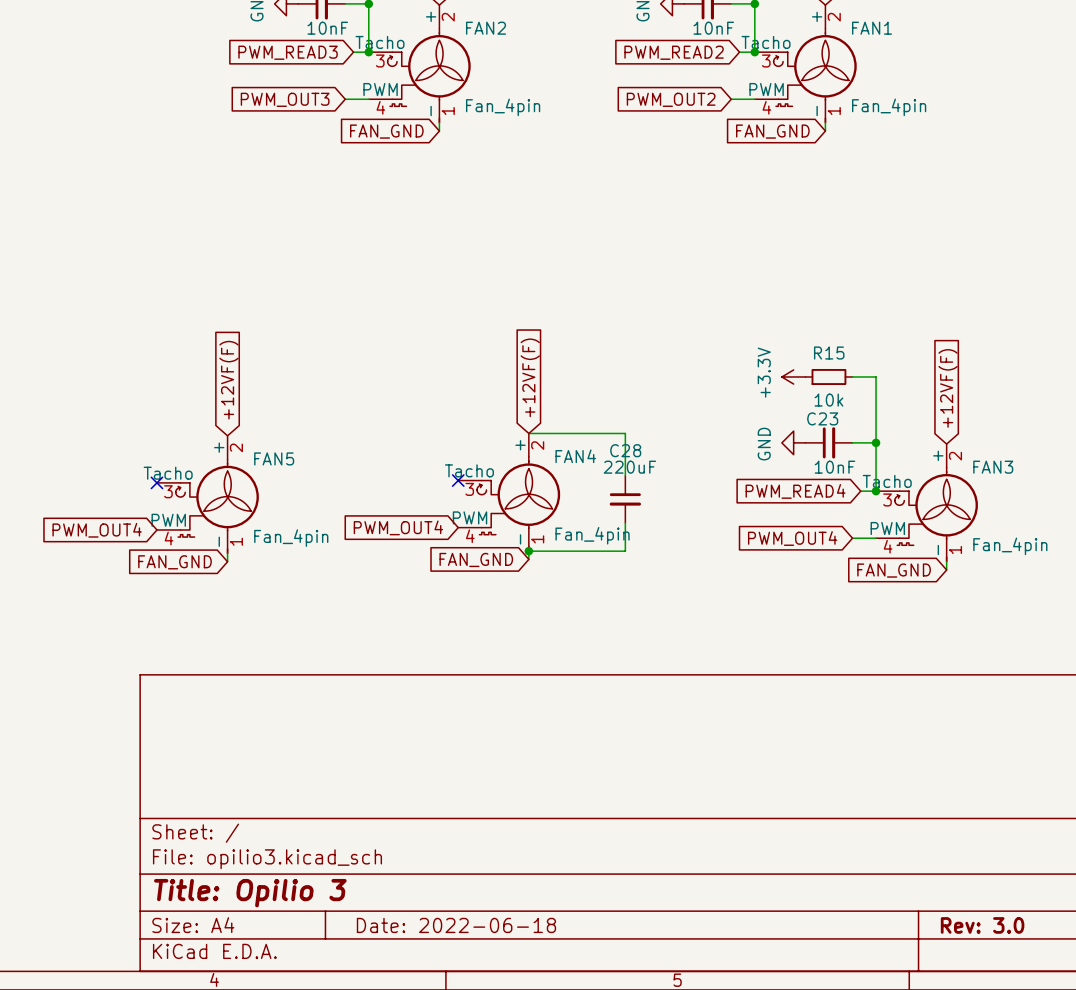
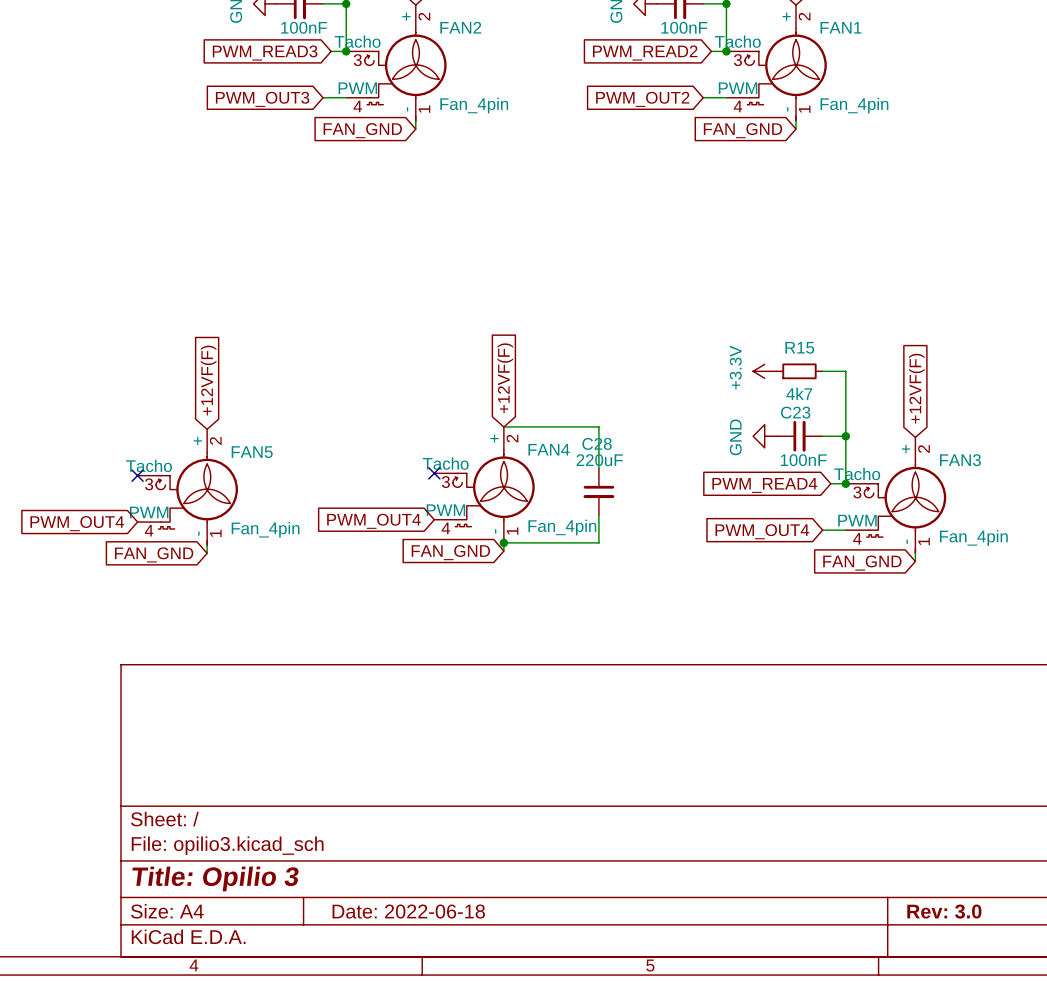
part value: 10nF (327, 28) -> 100nF (304, 27)
part value: 10nF (713, 28) -> 100nF (684, 27)
R15 value: 10k (828, 400) -> 4k7 (799, 393)
C23 value: 10nF (834, 467) -> 100nF (803, 460)

